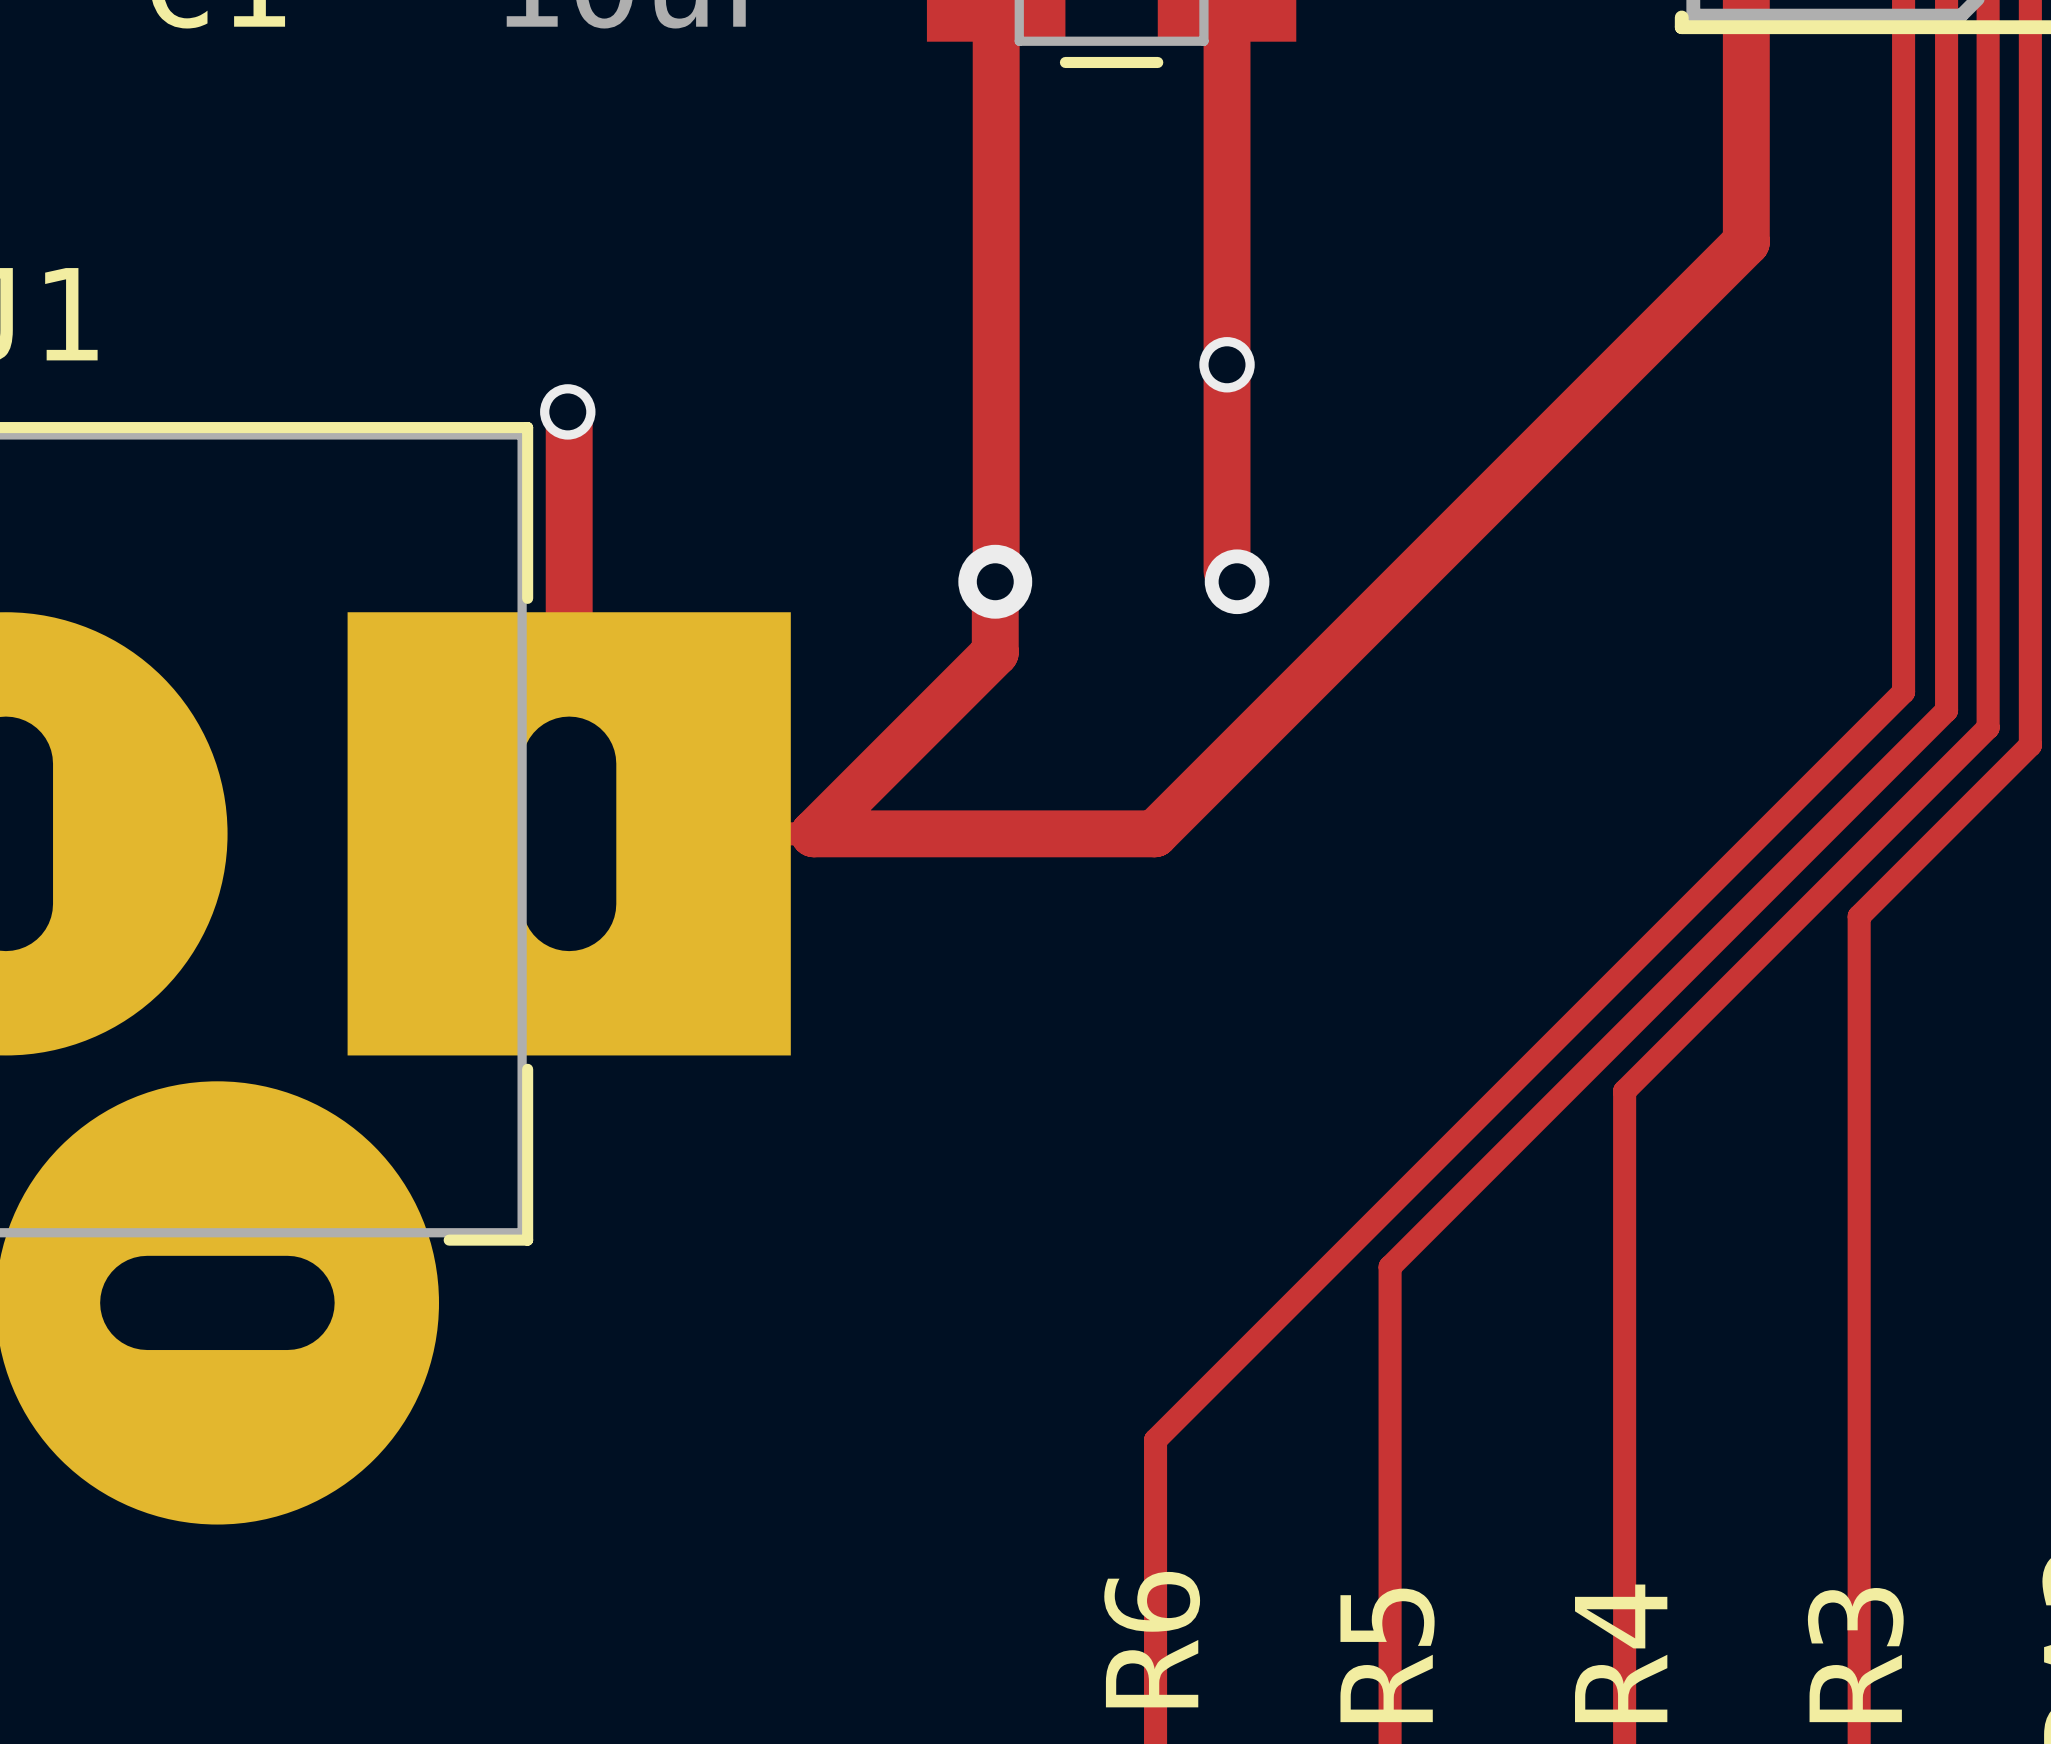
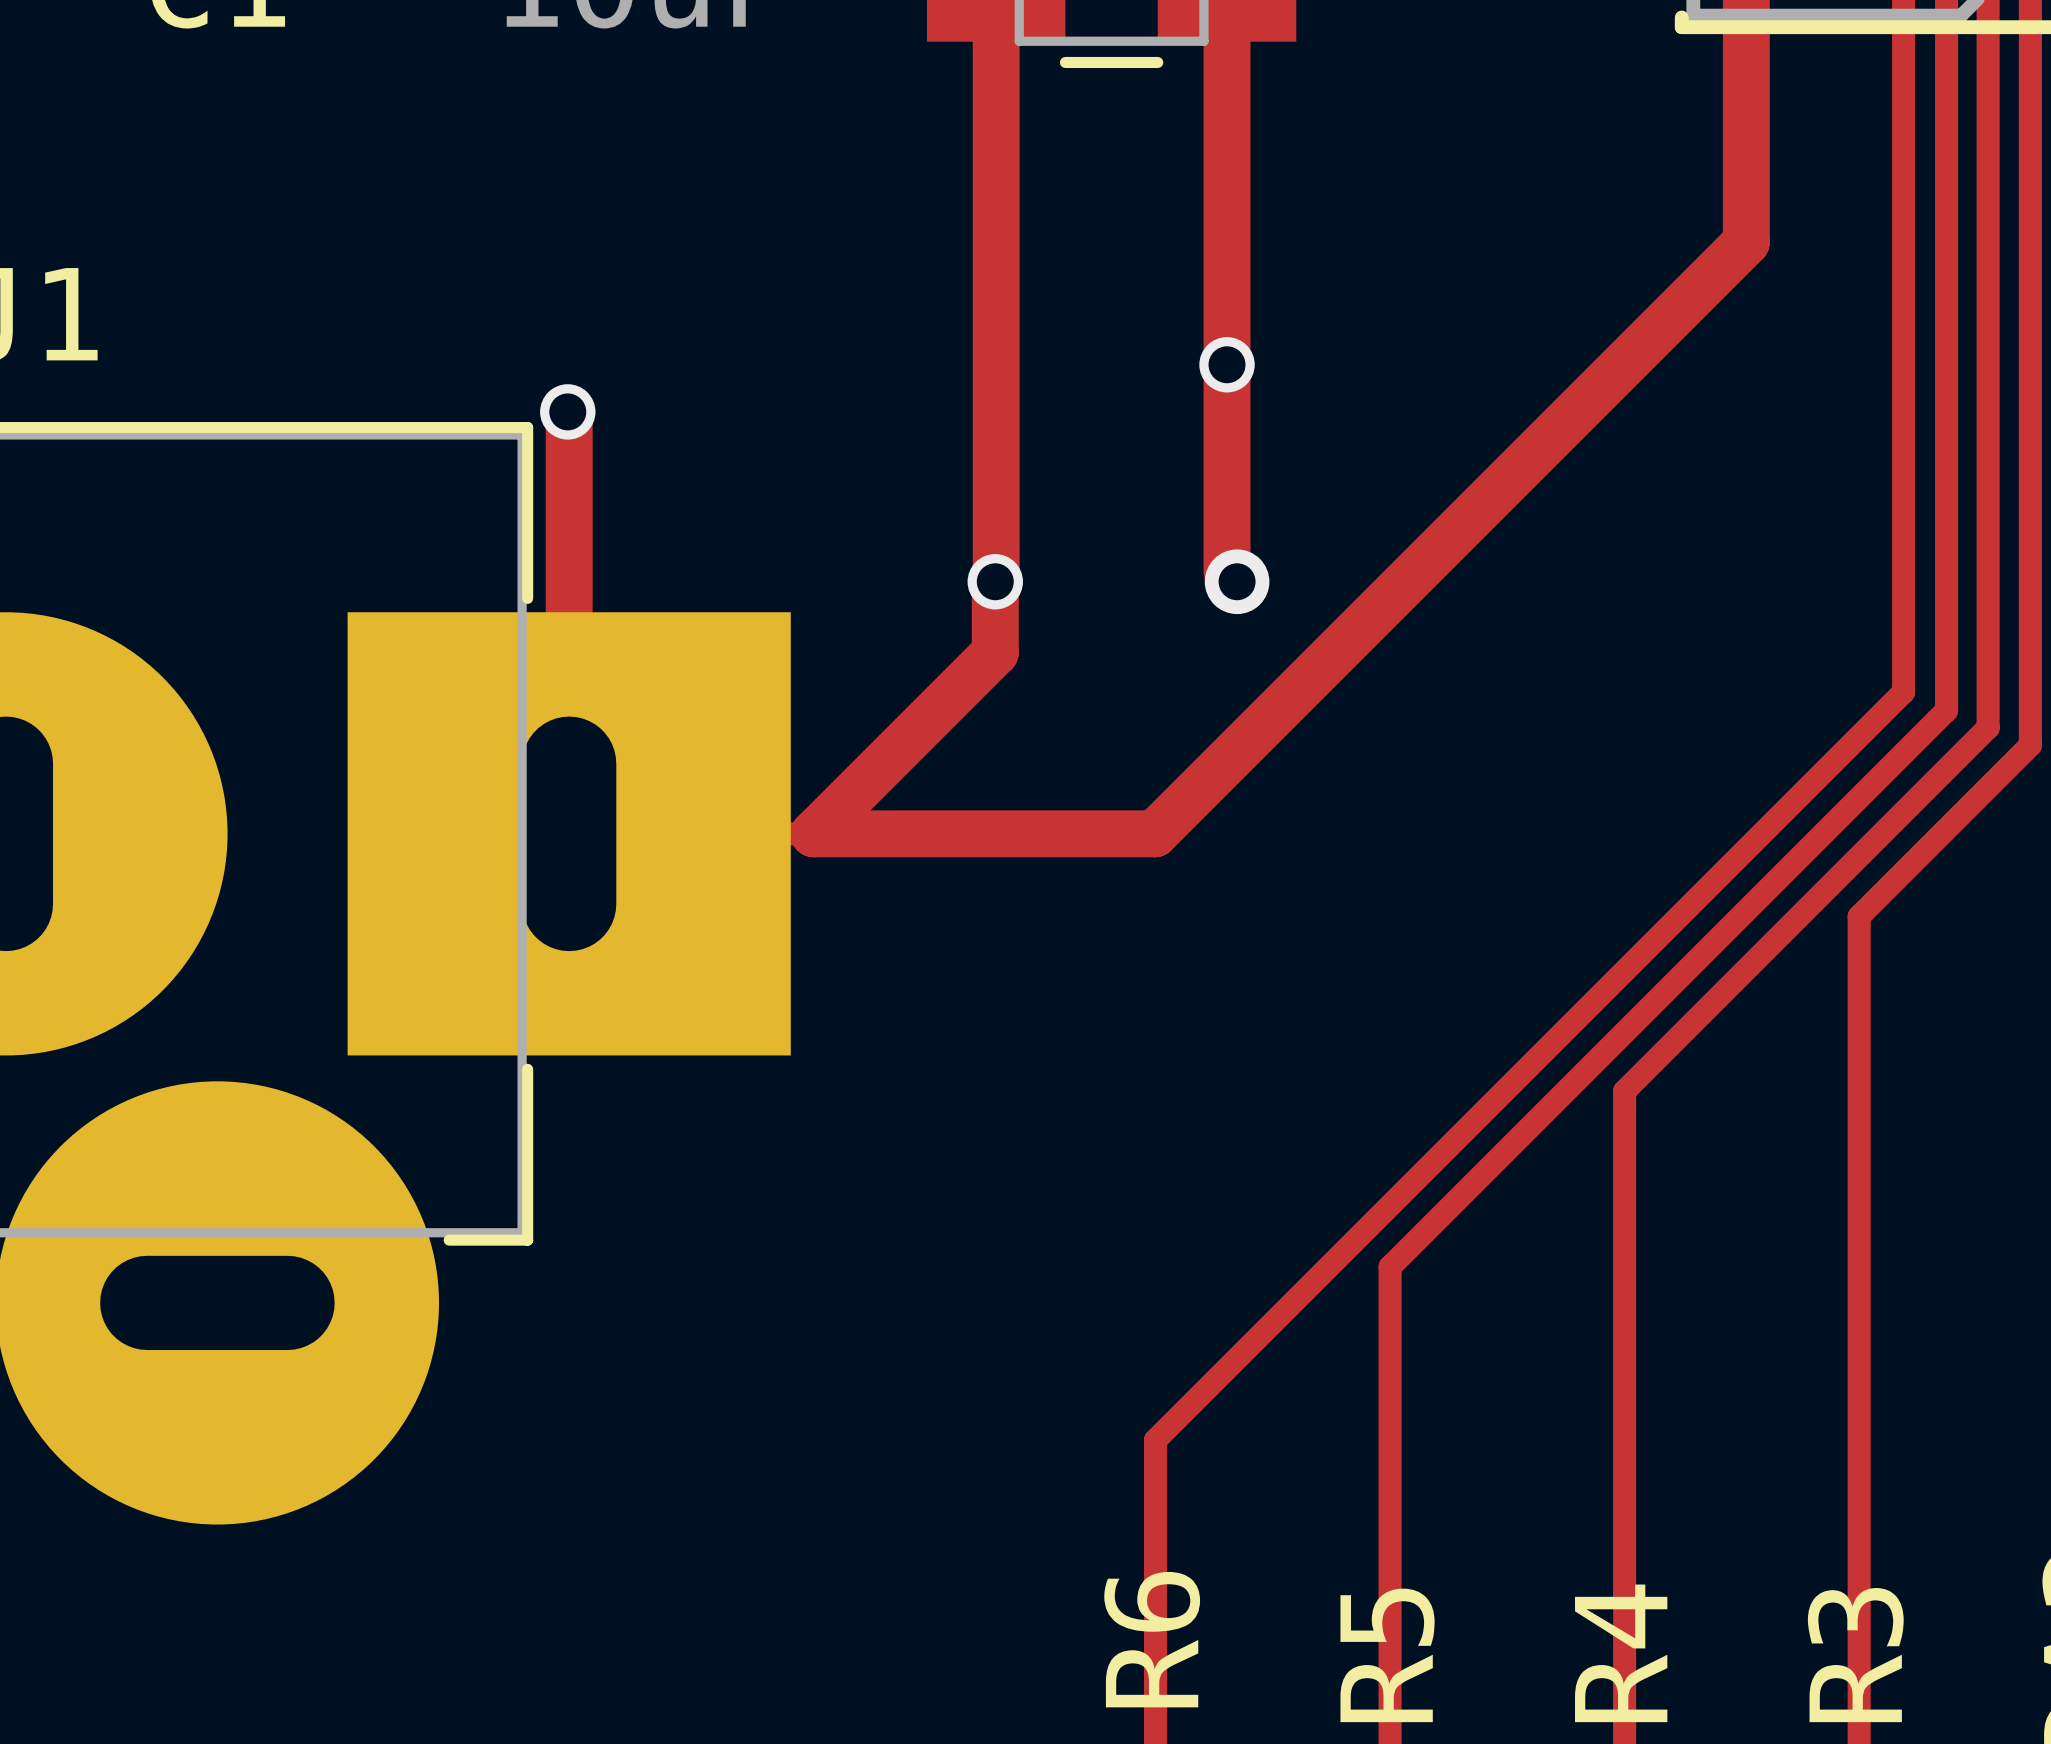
via size: [958, 544, 1033, 619] -> [967, 554, 1023, 610]

